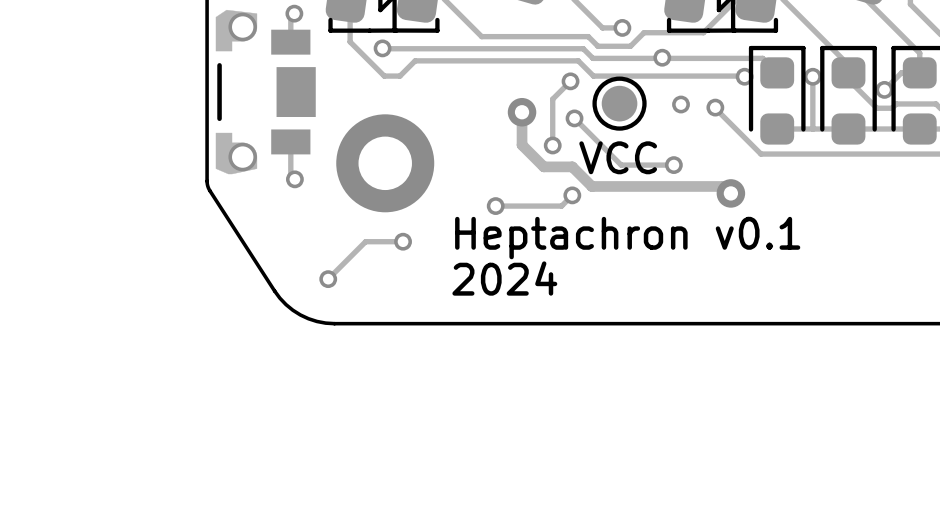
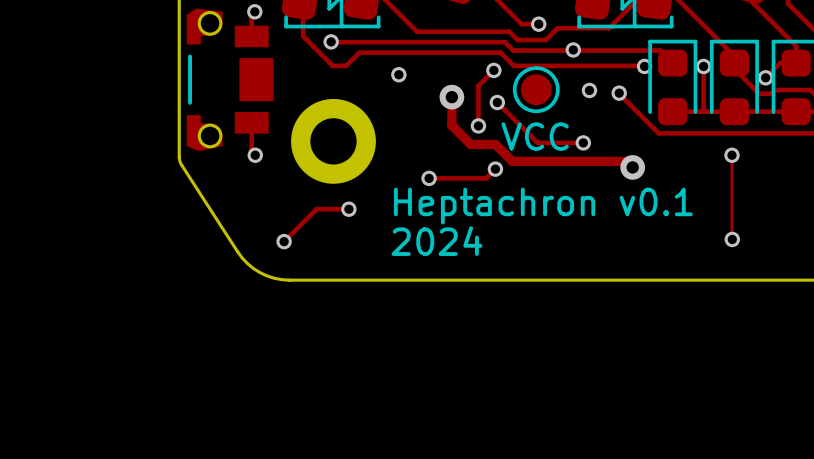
via: none -> (398, 74)
track: none -> (732, 155) (732, 239)
via: none -> (732, 155)
via: none -> (732, 239)

